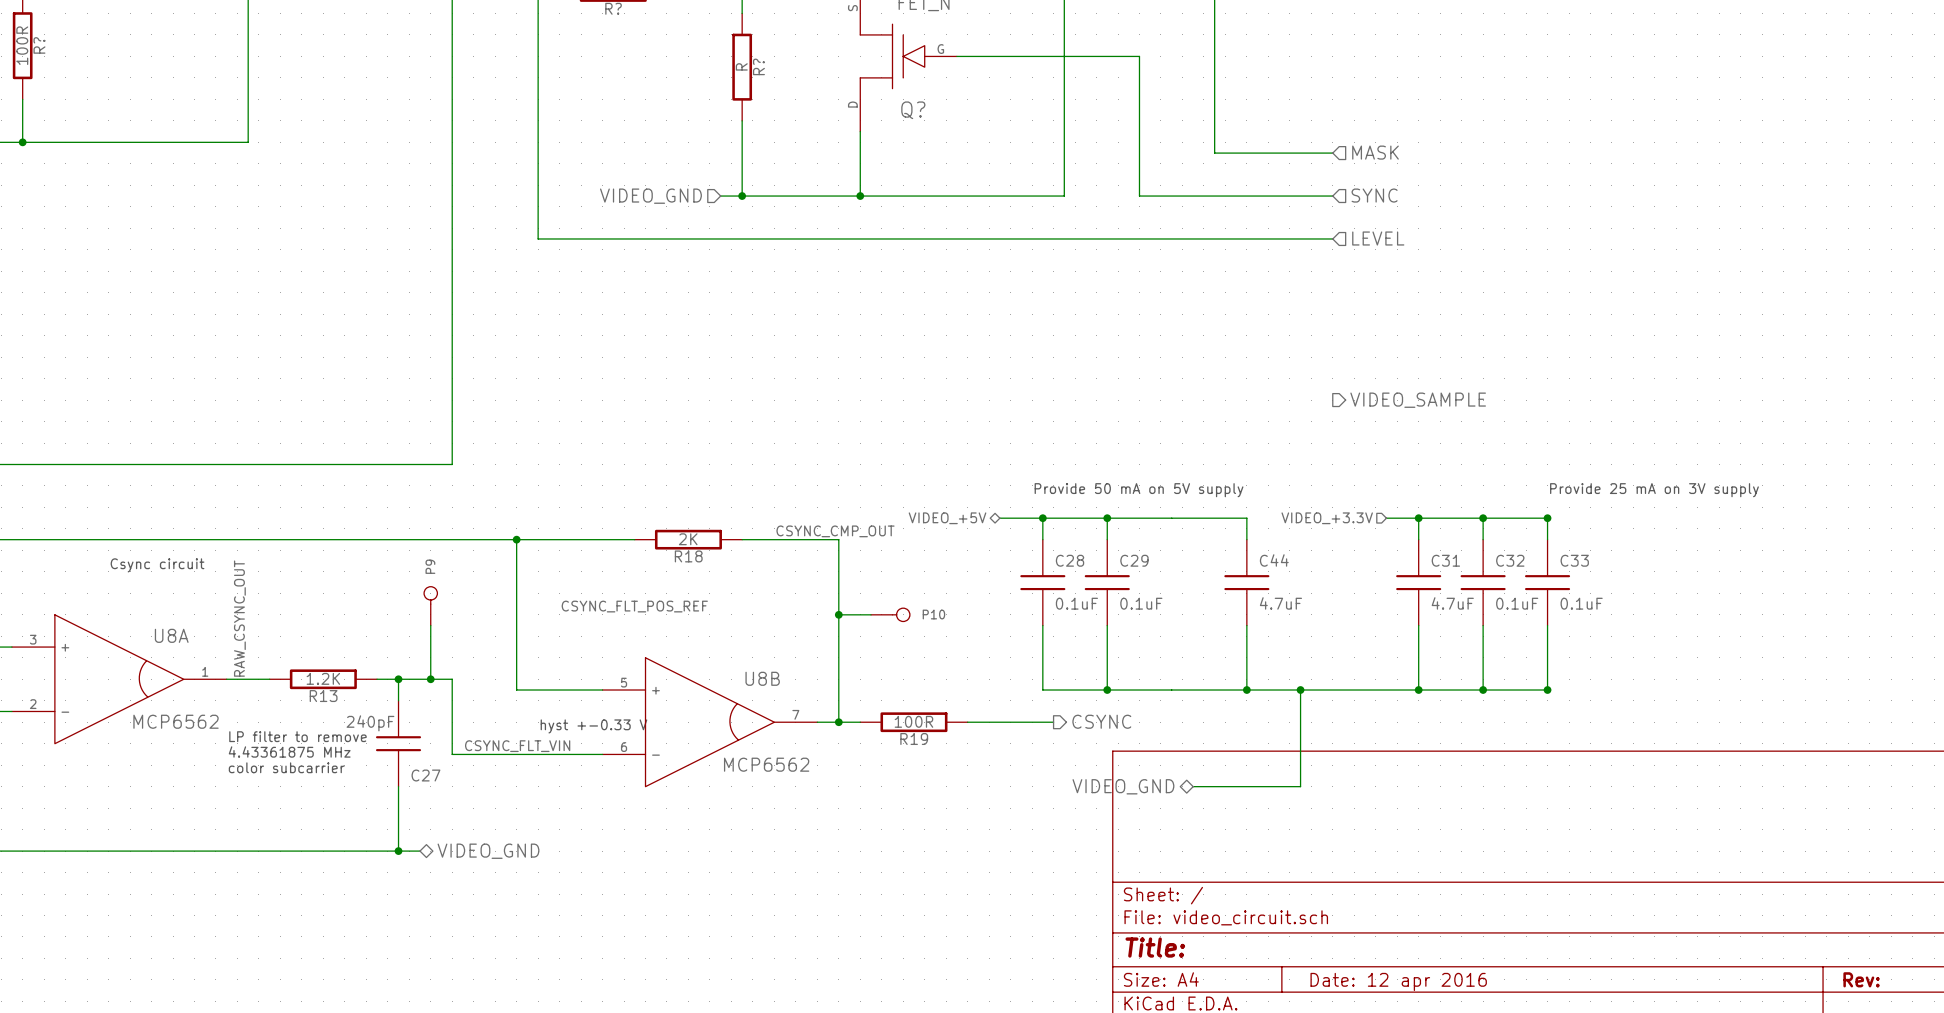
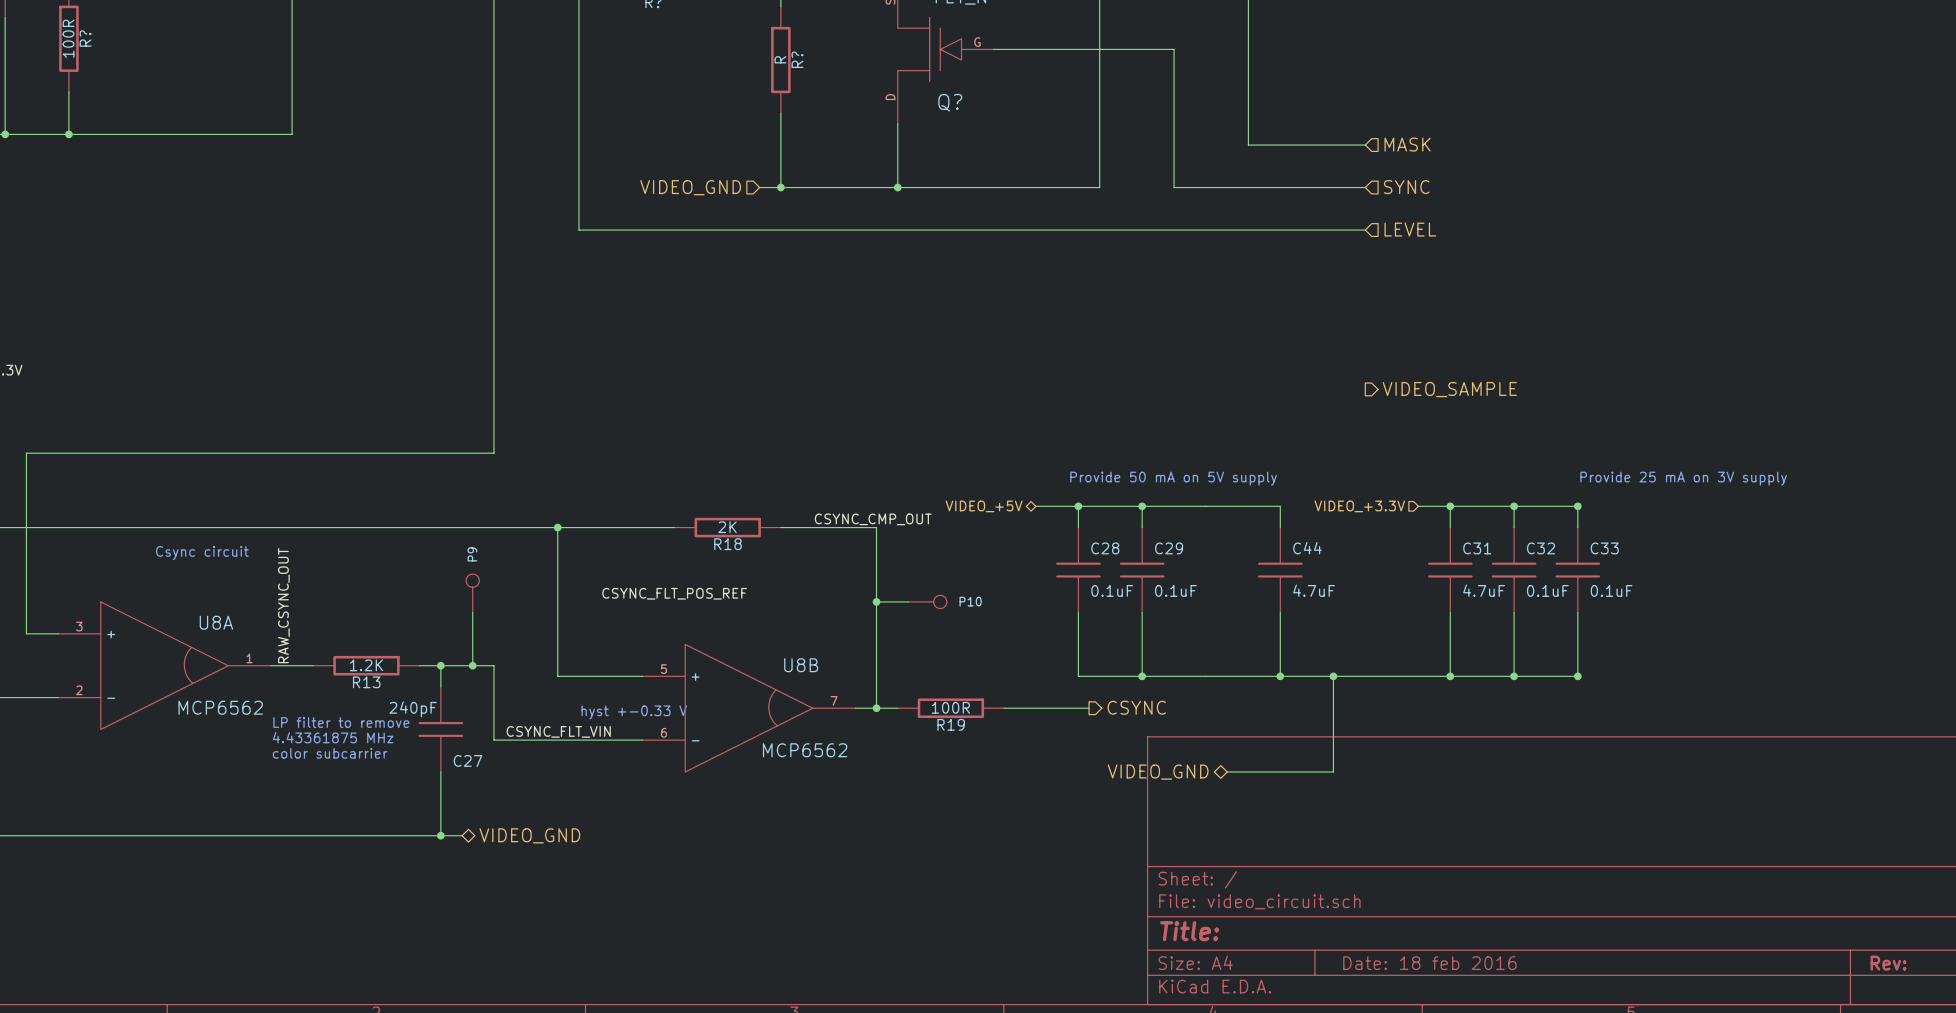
title block: Date: 12 apr 2016 (1398, 981) -> Date: 18 feb 2016 (1429, 963)

